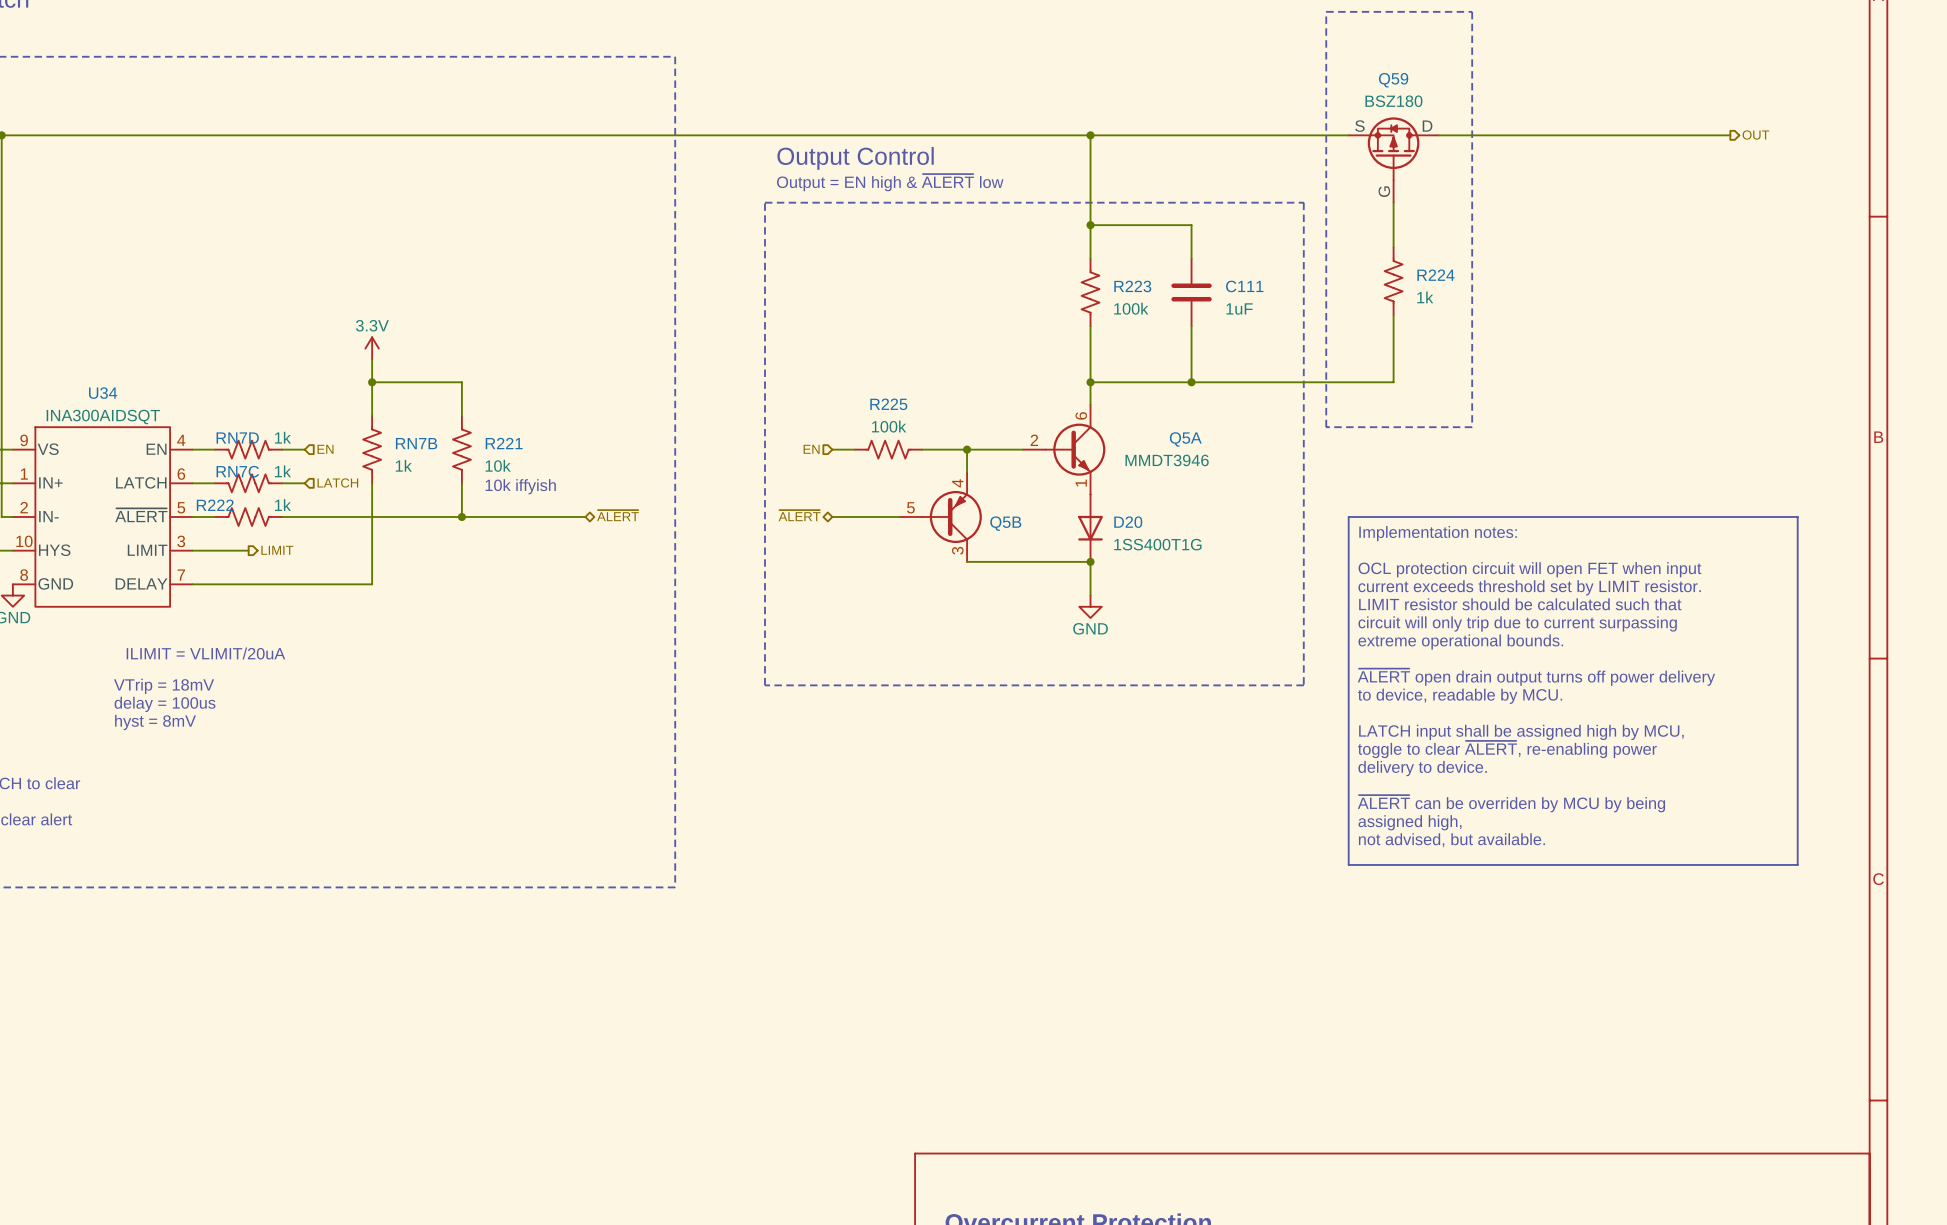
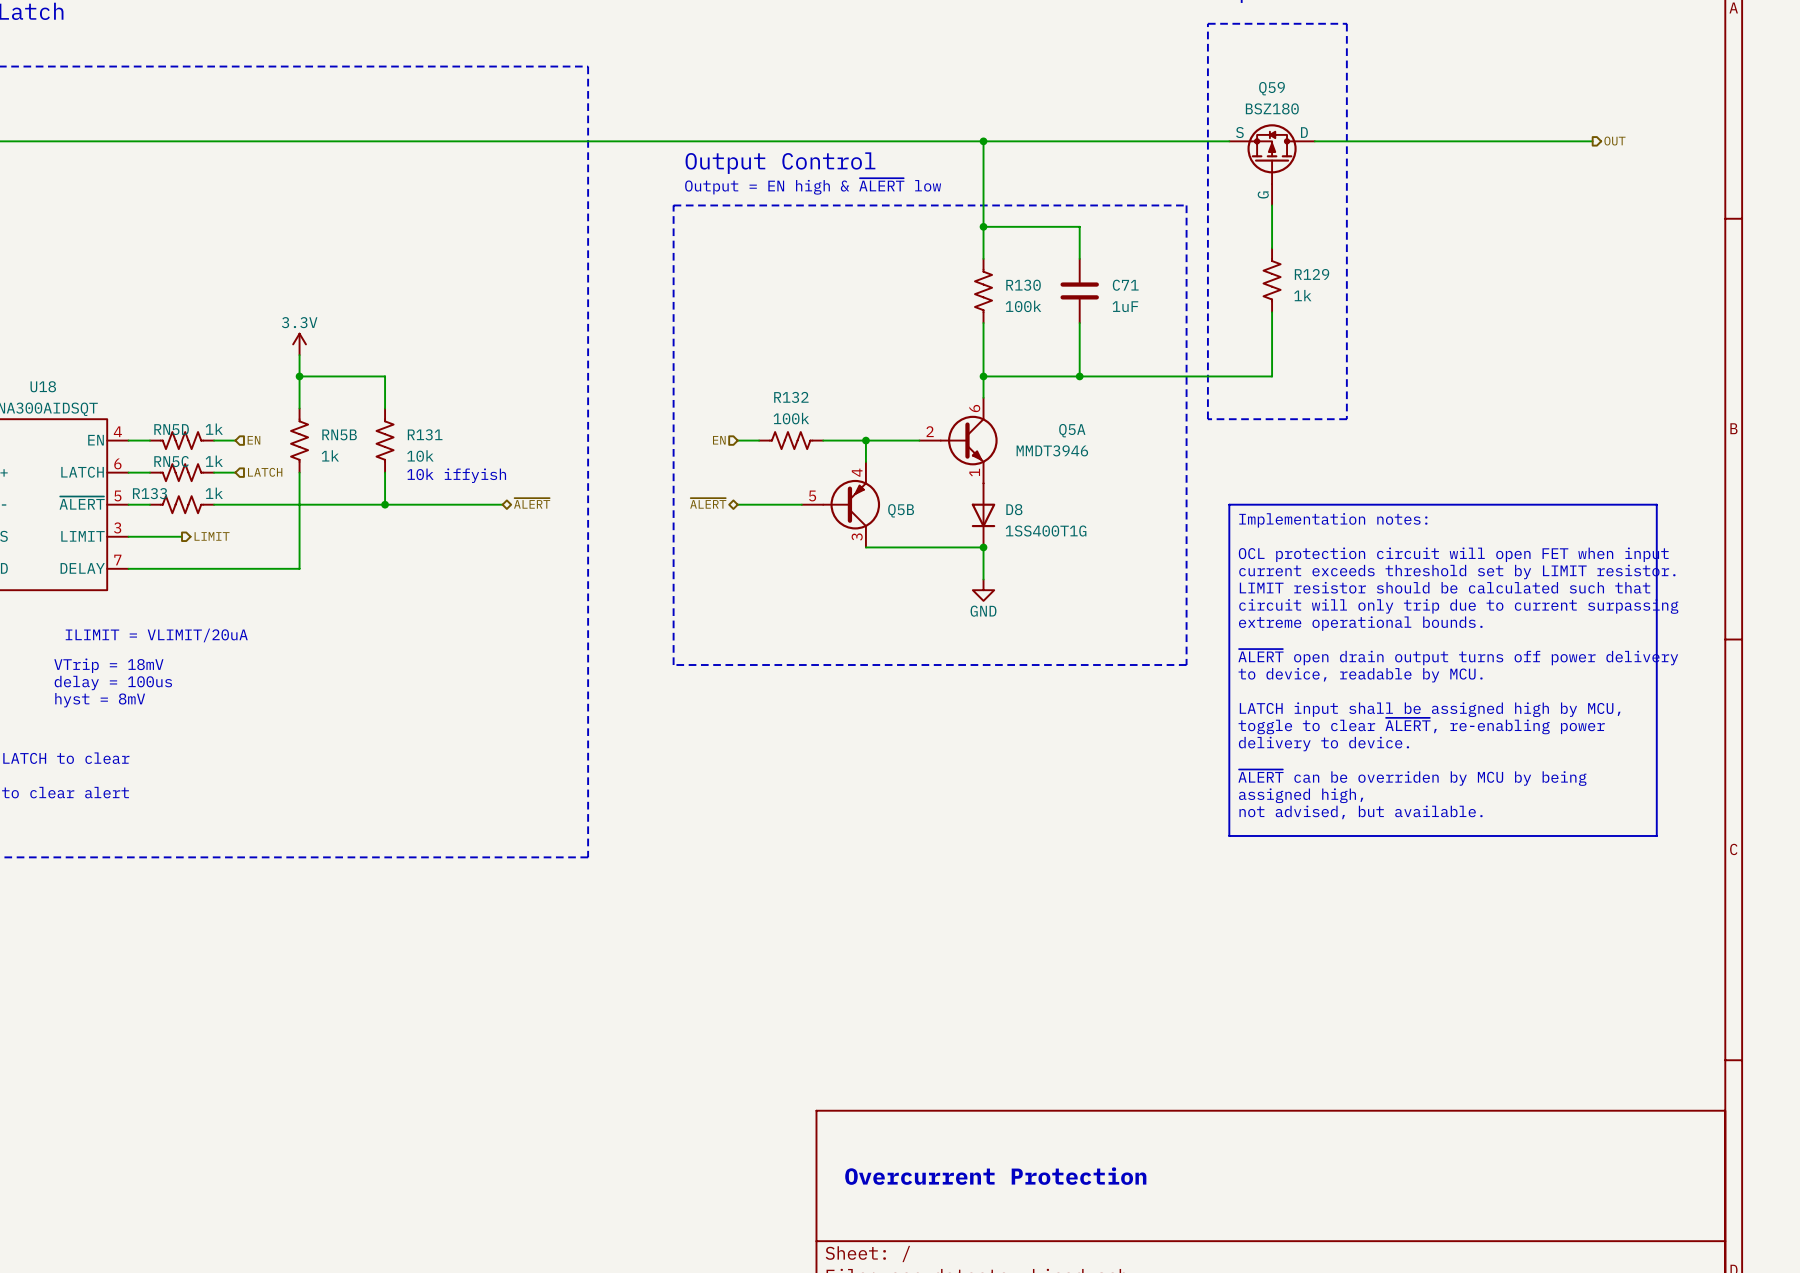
R224 name: R224 (1435, 275) -> R129 (1312, 274)
R223 name: R223 (1132, 286) -> R130 (1023, 285)
C111 name: C111 (1244, 286) -> C71 (1125, 285)
U34 name: U34 (103, 393) -> U18 (43, 386)
R225 name: R225 (888, 404) -> R132 (791, 397)
RN7D name: RN7D (237, 437) -> RN5D (171, 429)
RN7B name: RN7B (416, 443) -> RN5B (339, 434)
R221 name: R221 (504, 443) -> R131 (425, 434)
RN7C name: RN7C (237, 471) -> RN5C (171, 461)
R222 name: R222 (215, 505) -> R133 (150, 493)
D20 name: D20 (1128, 522) -> D8 (1014, 509)

